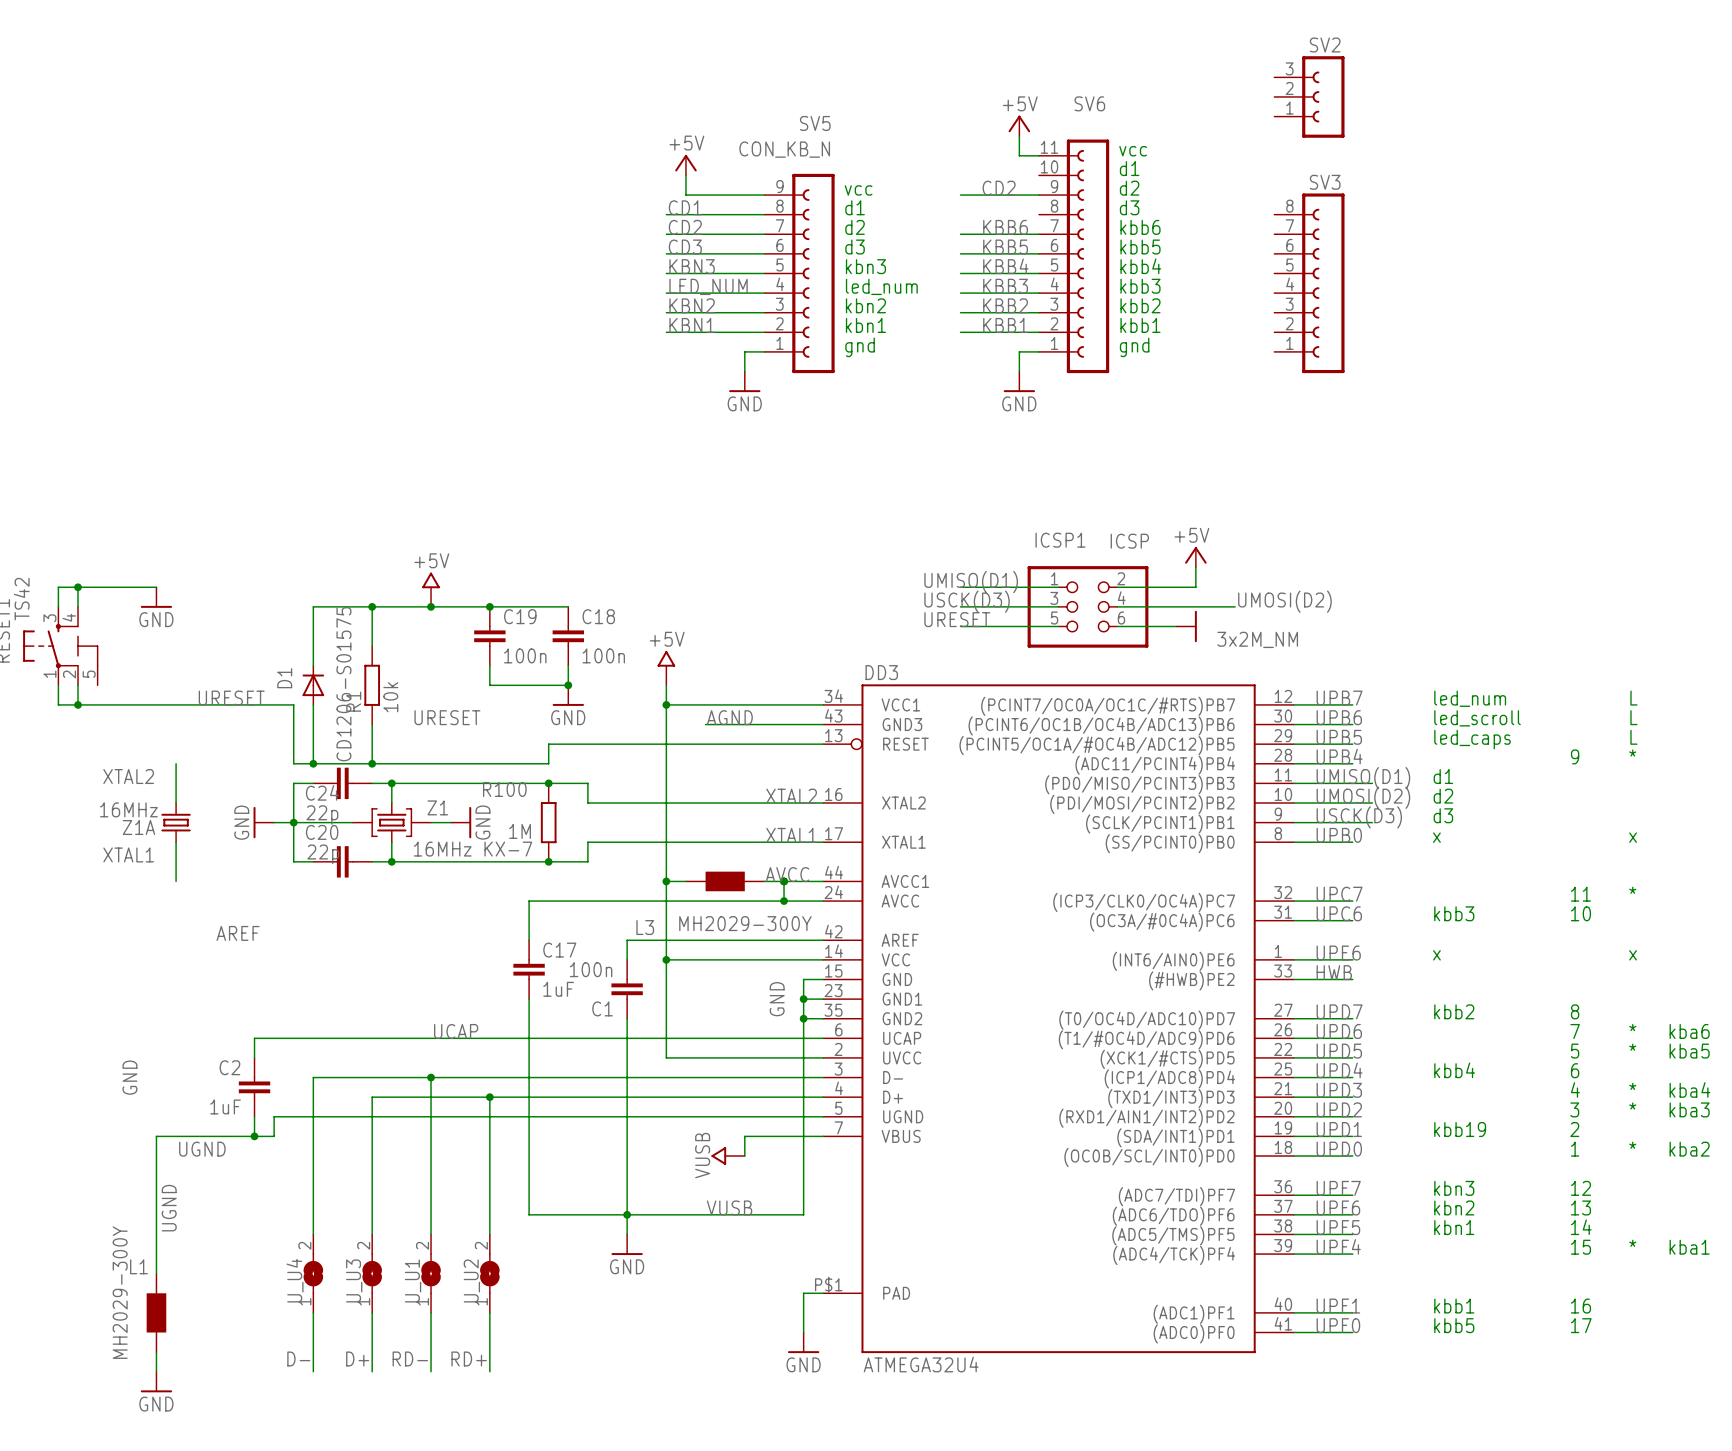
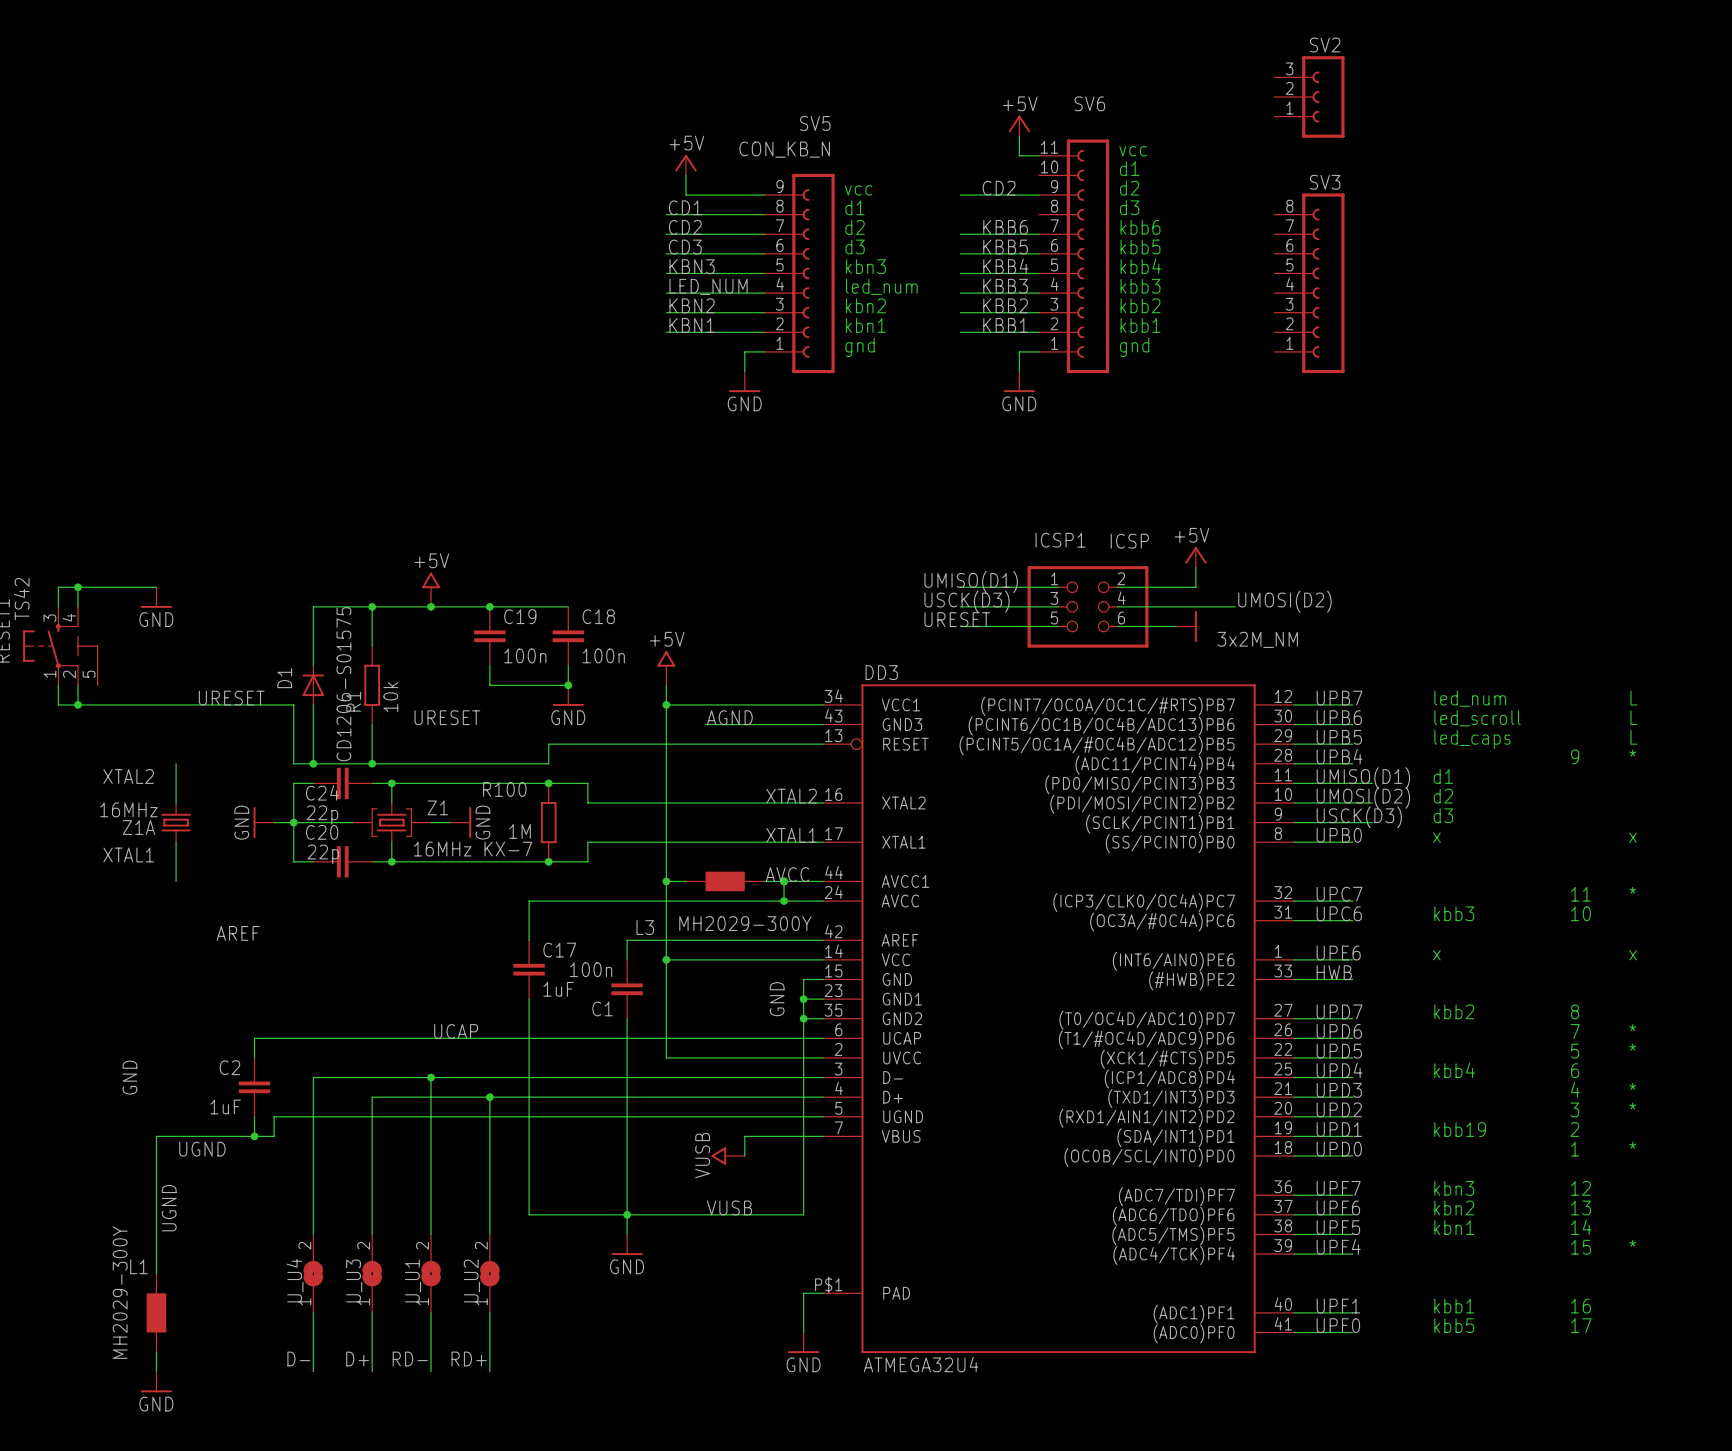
text: kba6 (1689, 1031) -> none
text: kba5 (1689, 1051) -> none
text: kba4 (1689, 1089) -> none
text: kba3 (1689, 1109) -> none
text: kba2 (1689, 1149) -> none
text: kba1 (1689, 1247) -> none

